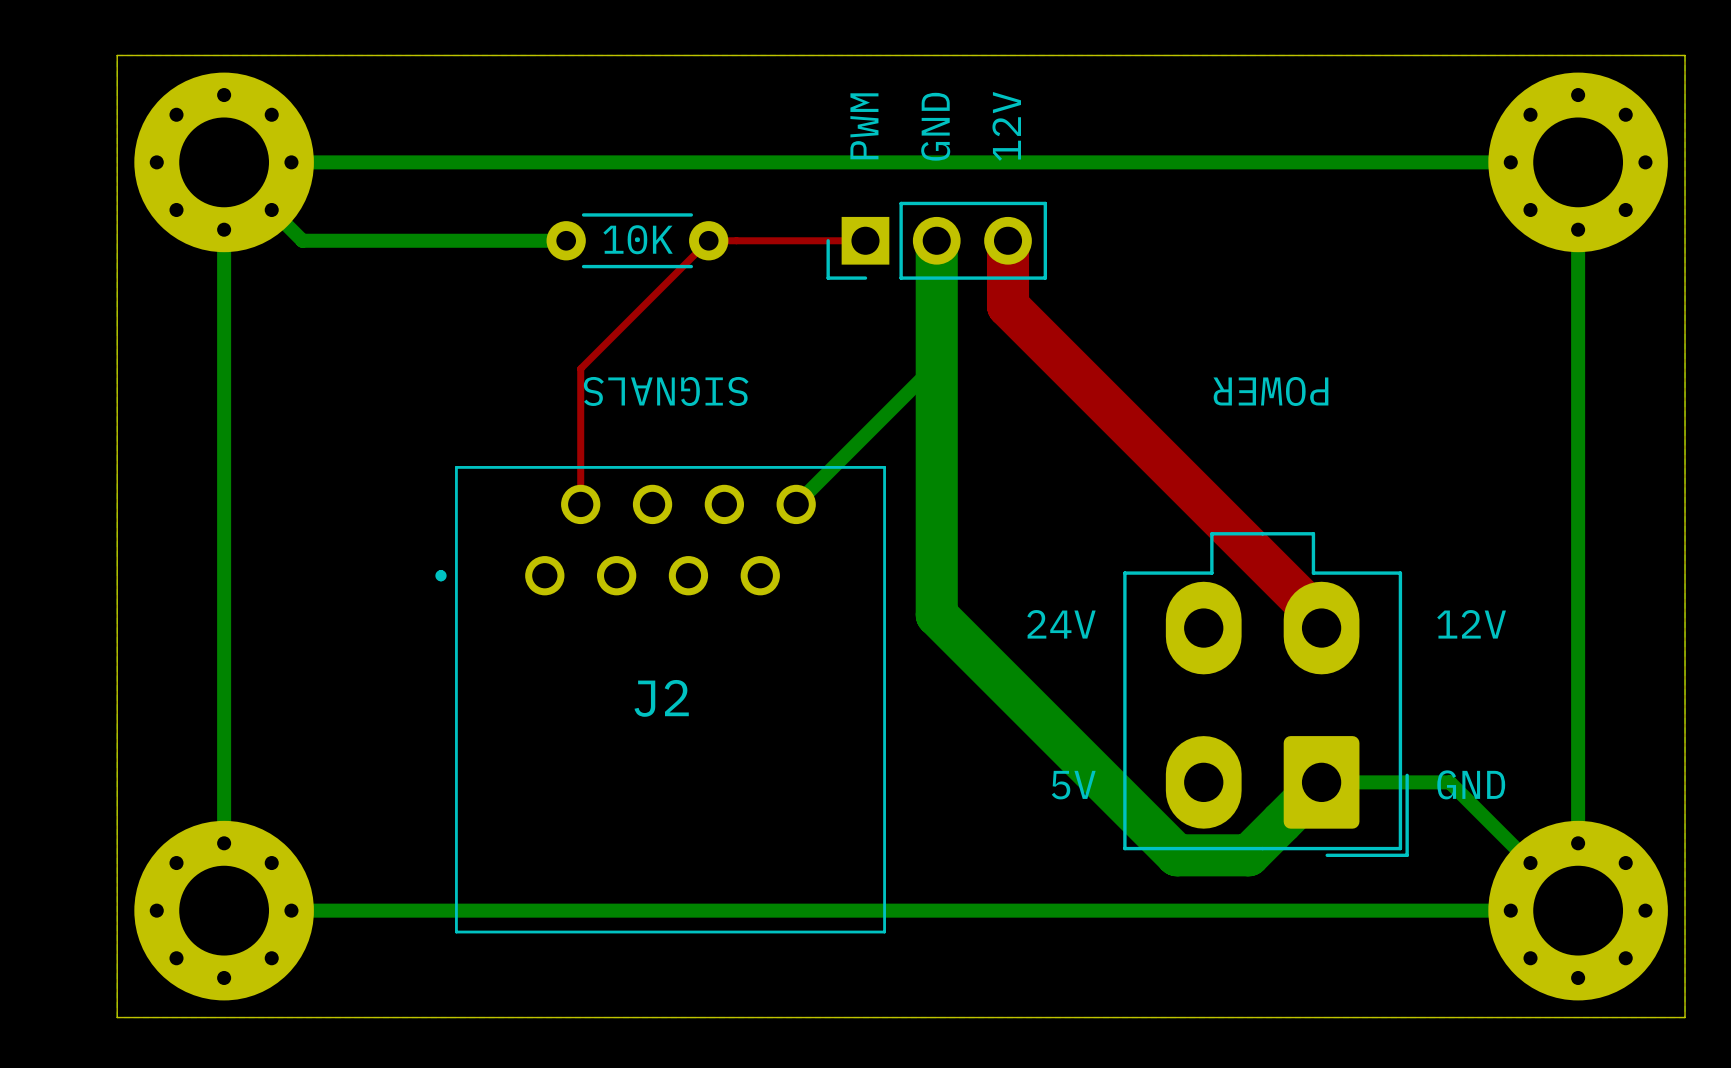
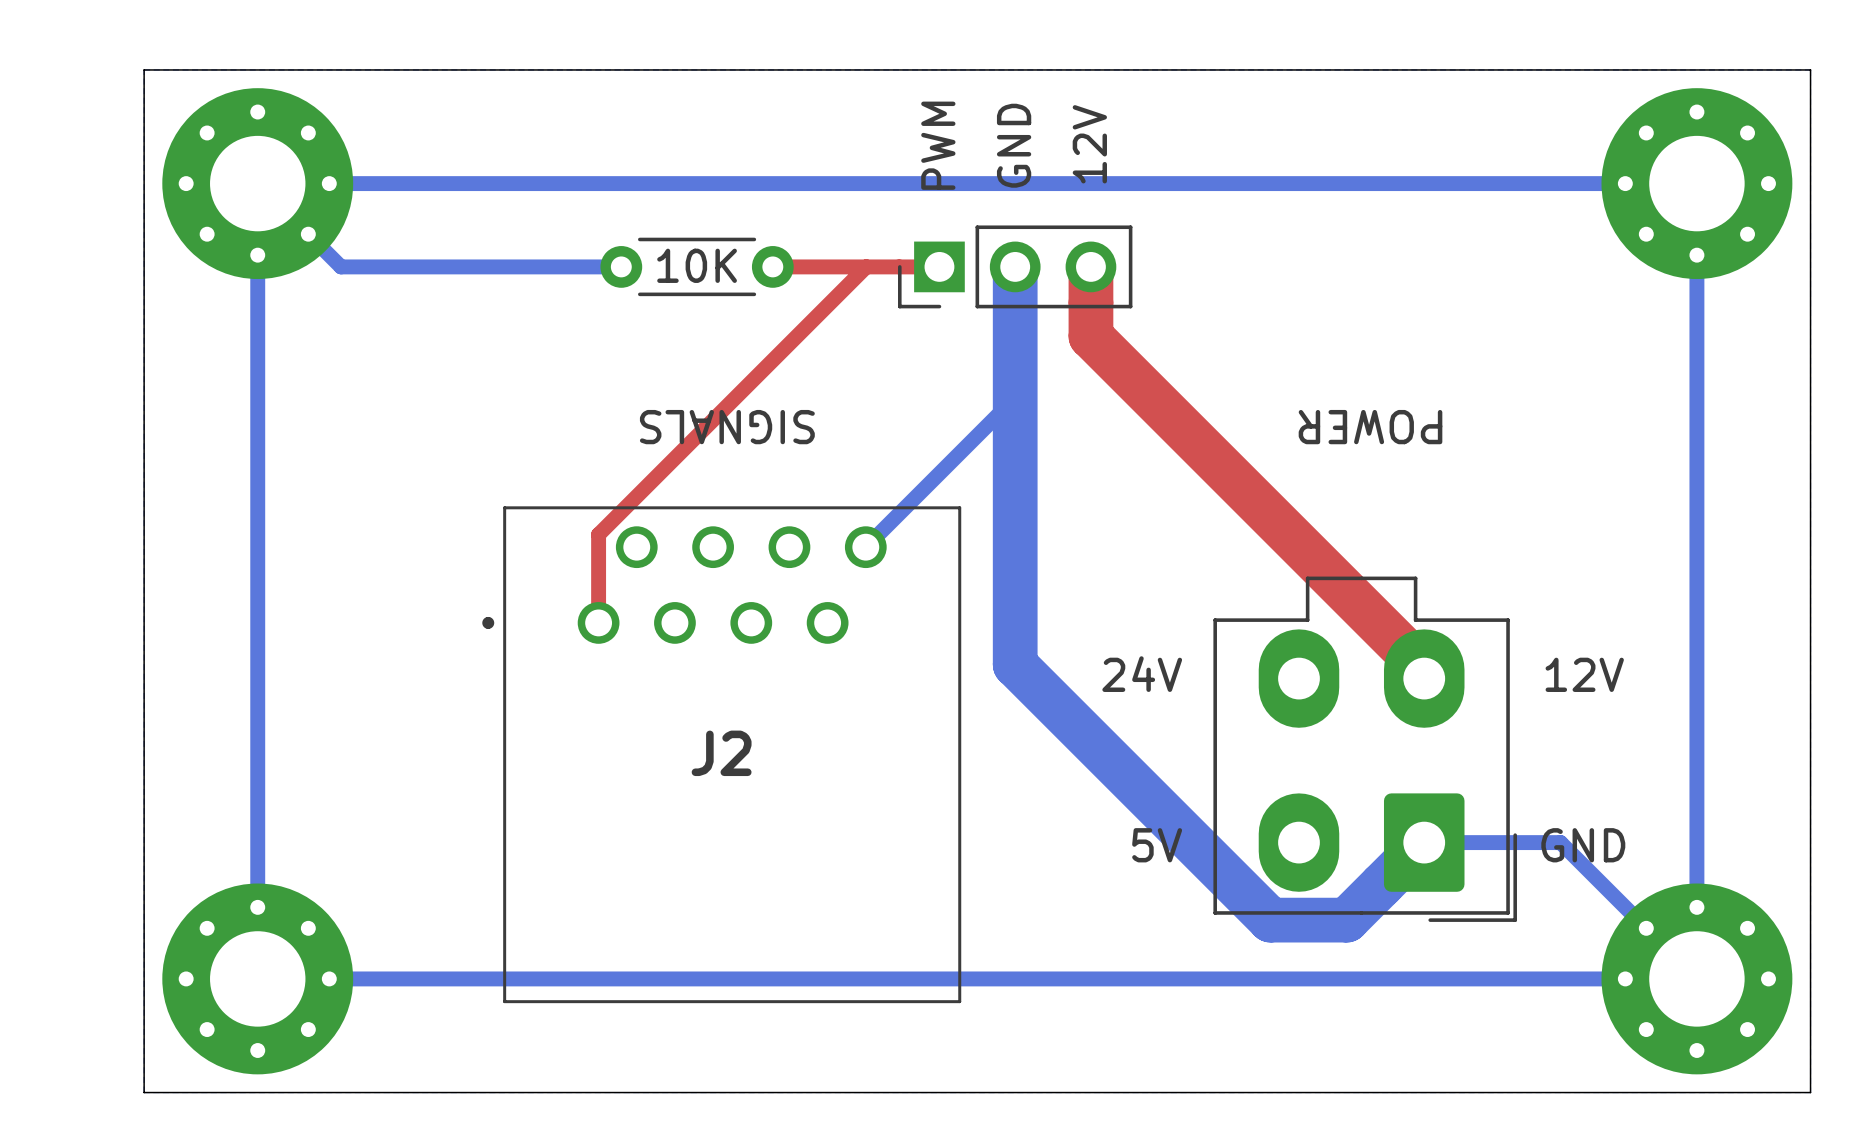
top track: (708, 240) (580, 368) (580, 504) -> none
top track width: thin (708, 240) (865, 240) -> thick (772, 266) (939, 266)
top track: none -> (866, 266) (598, 534) (598, 622)

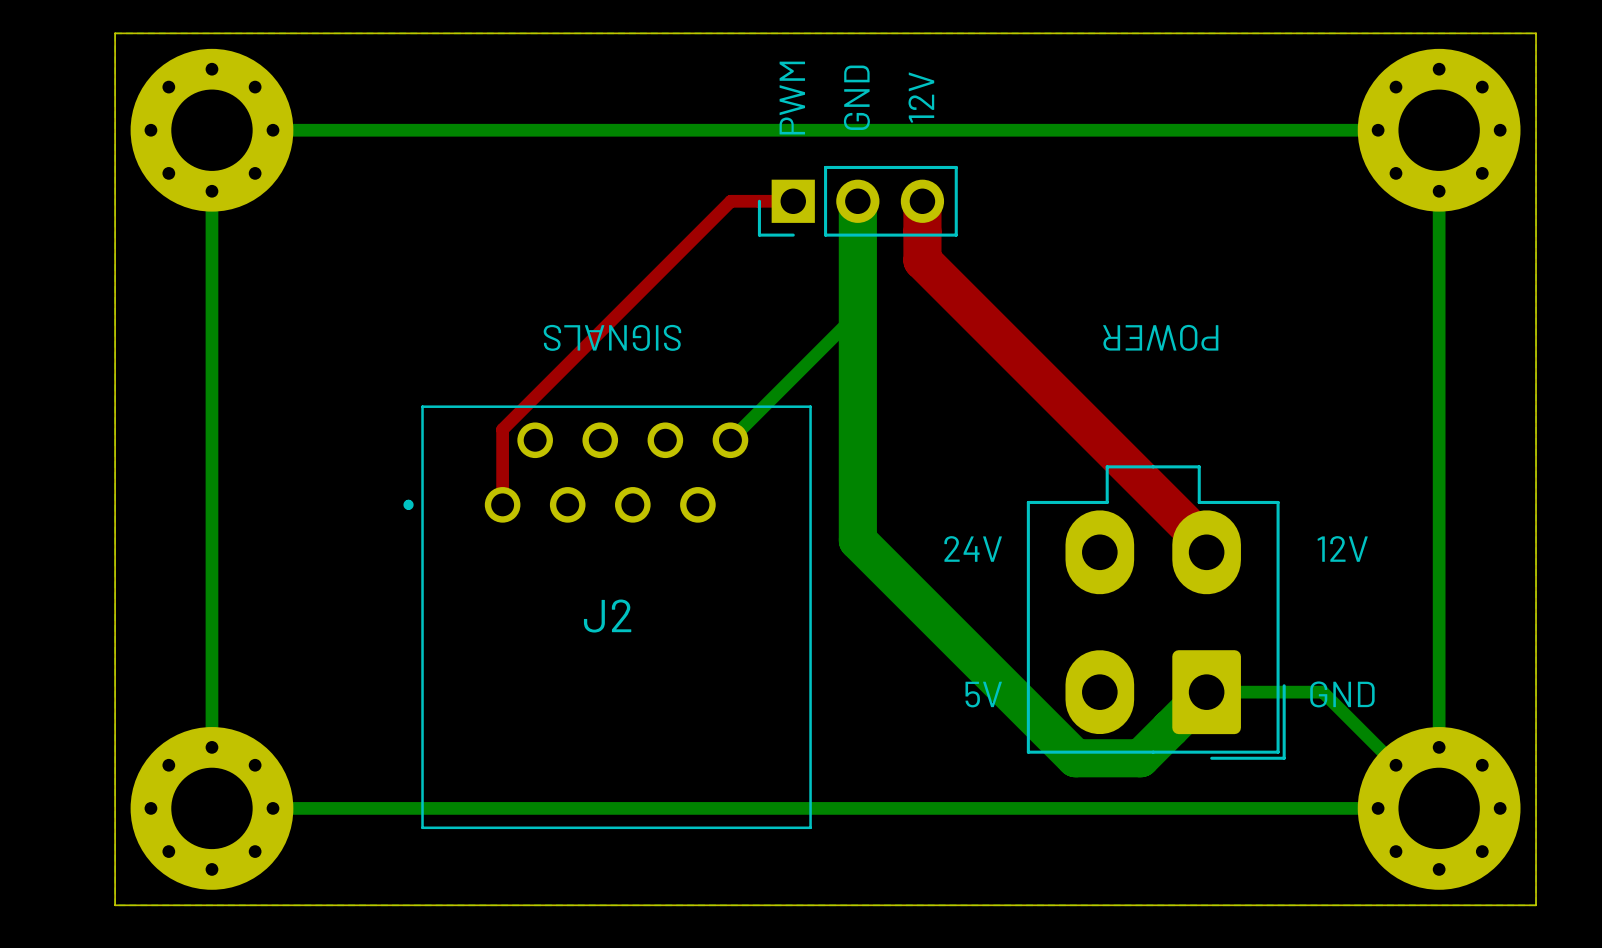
bottom track: (257, 183) (341, 266) (621, 266) -> none
part: 10K (697, 266) -> none
top track: (772, 266) (866, 266) -> none

